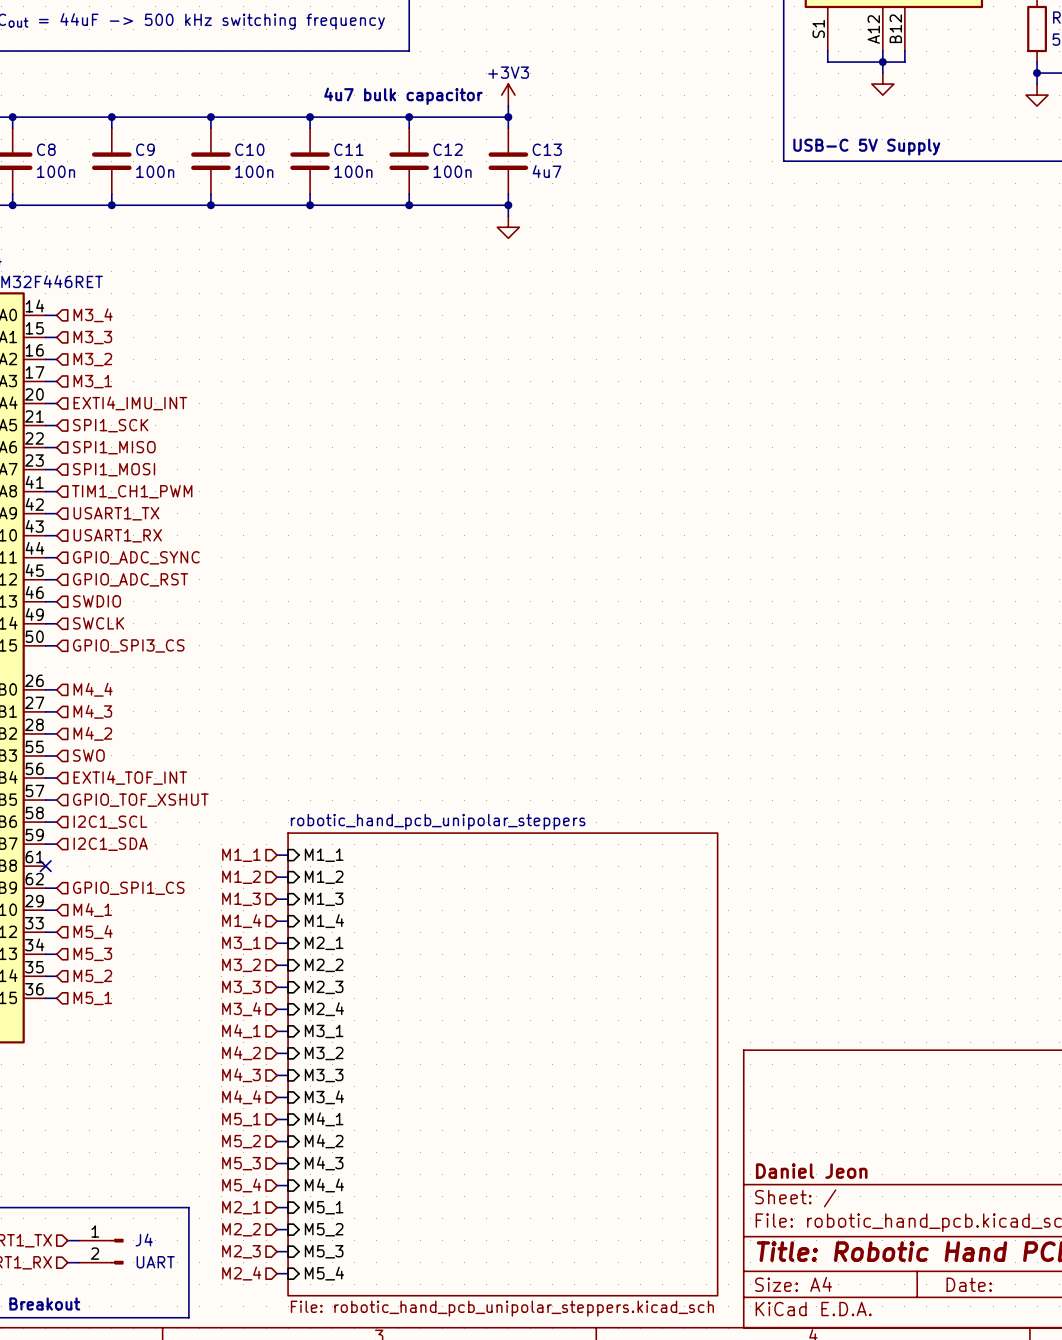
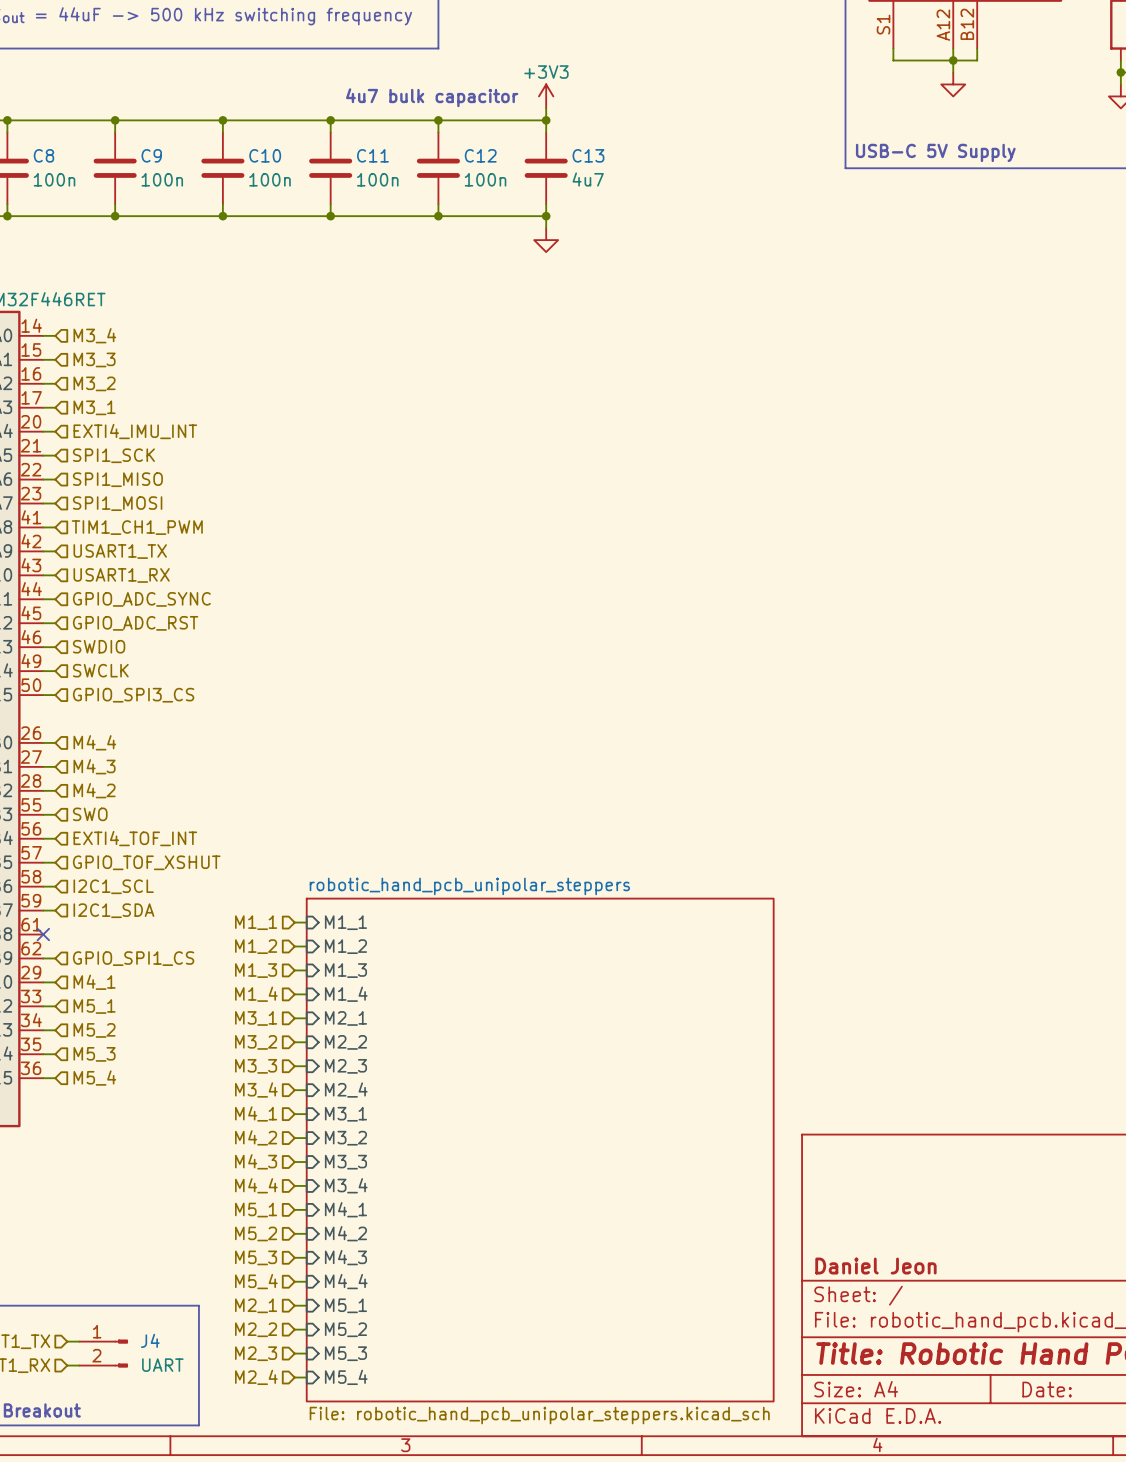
hierarchical label: M5_4 (93, 932) -> M5_1 (94, 1006)
hierarchical label: M5_3 (92, 954) -> M5_2 (94, 1030)
hierarchical label: M5_2 (92, 976) -> M5_3 (94, 1054)
hierarchical label: M5_1 (92, 998) -> M5_4 (94, 1078)

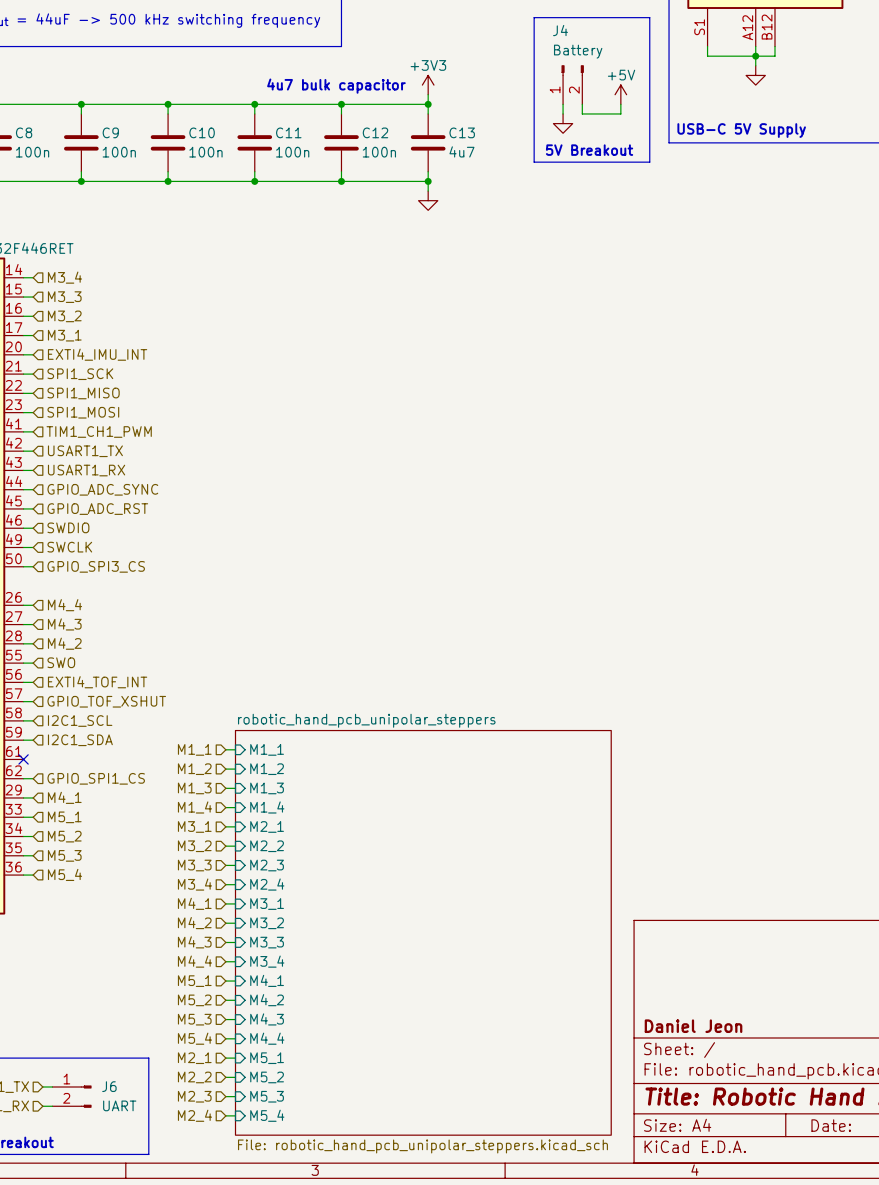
line: none -> (534, 17) (649, 17) (649, 162) (534, 162) (534, 17)
J4: none -> Battery (572, 84)
power symbol: none -> +5V (620, 94)
wire: none -> (563, 104) (563, 113)
wire: none -> (582, 104) (582, 113) (620, 113) (620, 104)
power symbol: none -> (563, 123)
text: none -> 5V Breakout (589, 150)
J4 name: J4 (150, 1340) -> J6 (109, 1086)

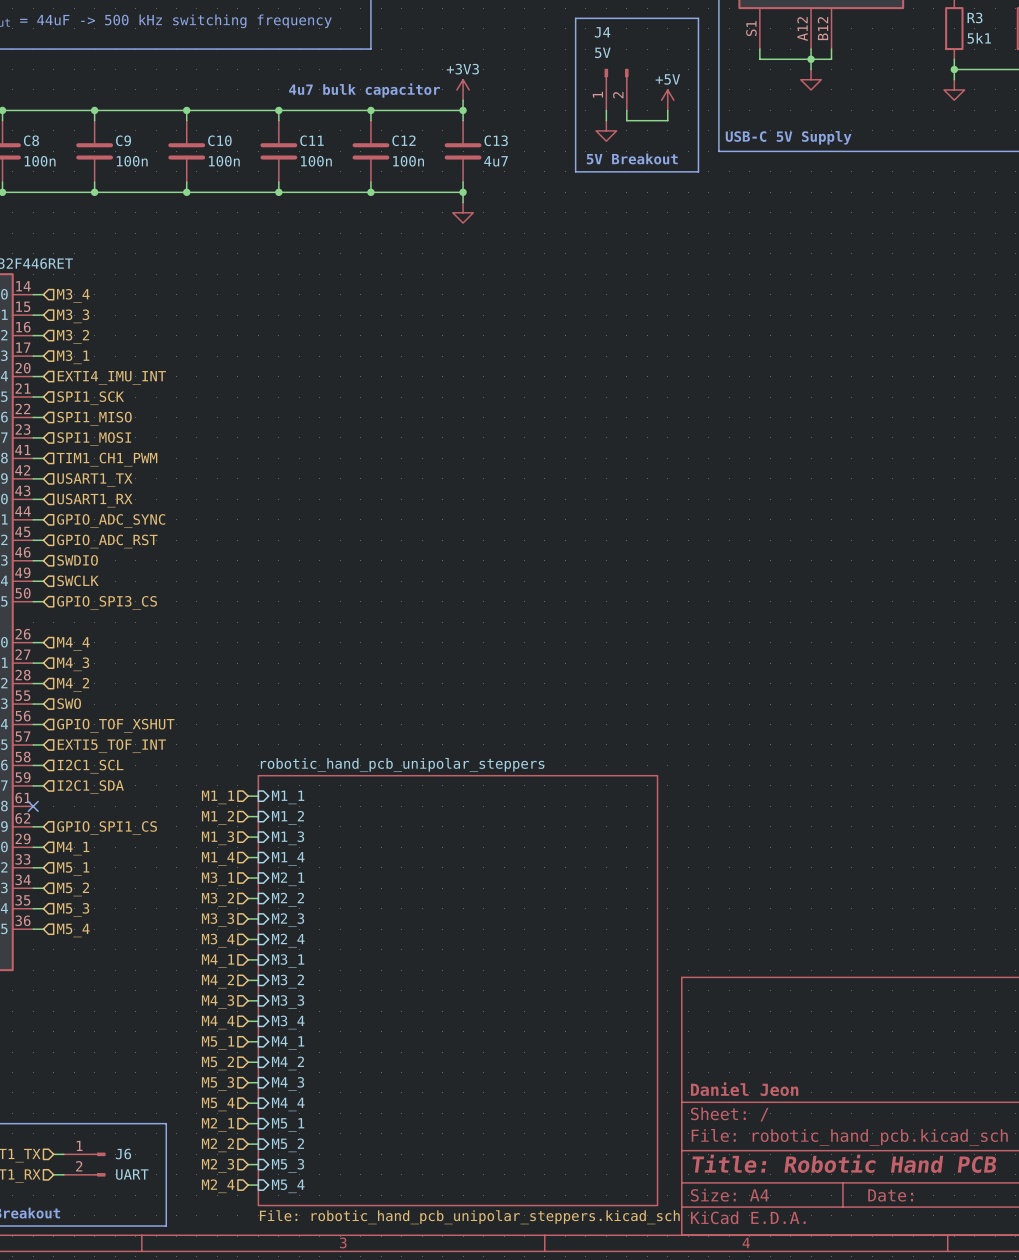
J4 value: Battery (578, 51) -> 5V (602, 52)
hierarchical label: EXTI4_TOF_INT (97, 682) -> GPIO_TOF_XSHUT (115, 725)
hierarchical label: GPIO_TOF_XSHUT (106, 701) -> EXTI5_TOF_INT (111, 746)

